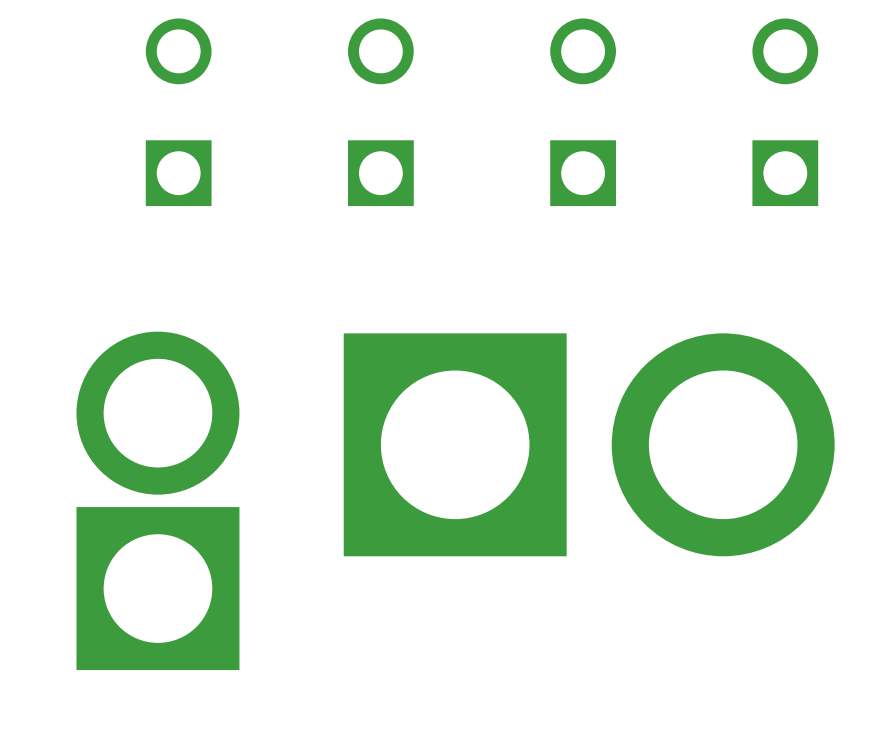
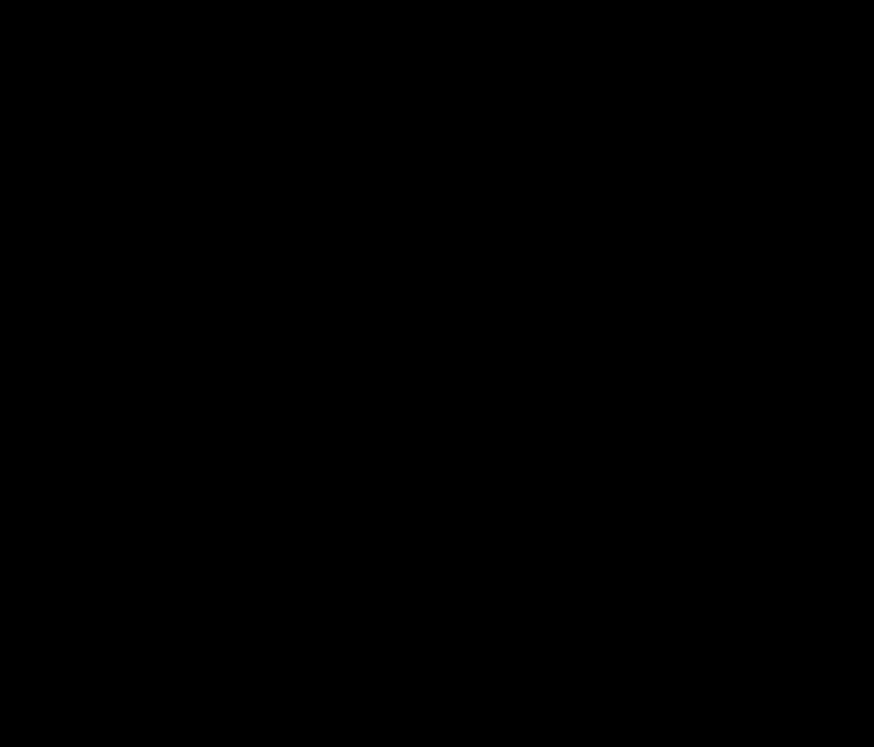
part: (178, 112) -> none
part: (380, 112) -> none
part: (583, 112) -> none
part: (785, 112) -> none
part: (589, 444) -> none
part: (157, 500) -> none

